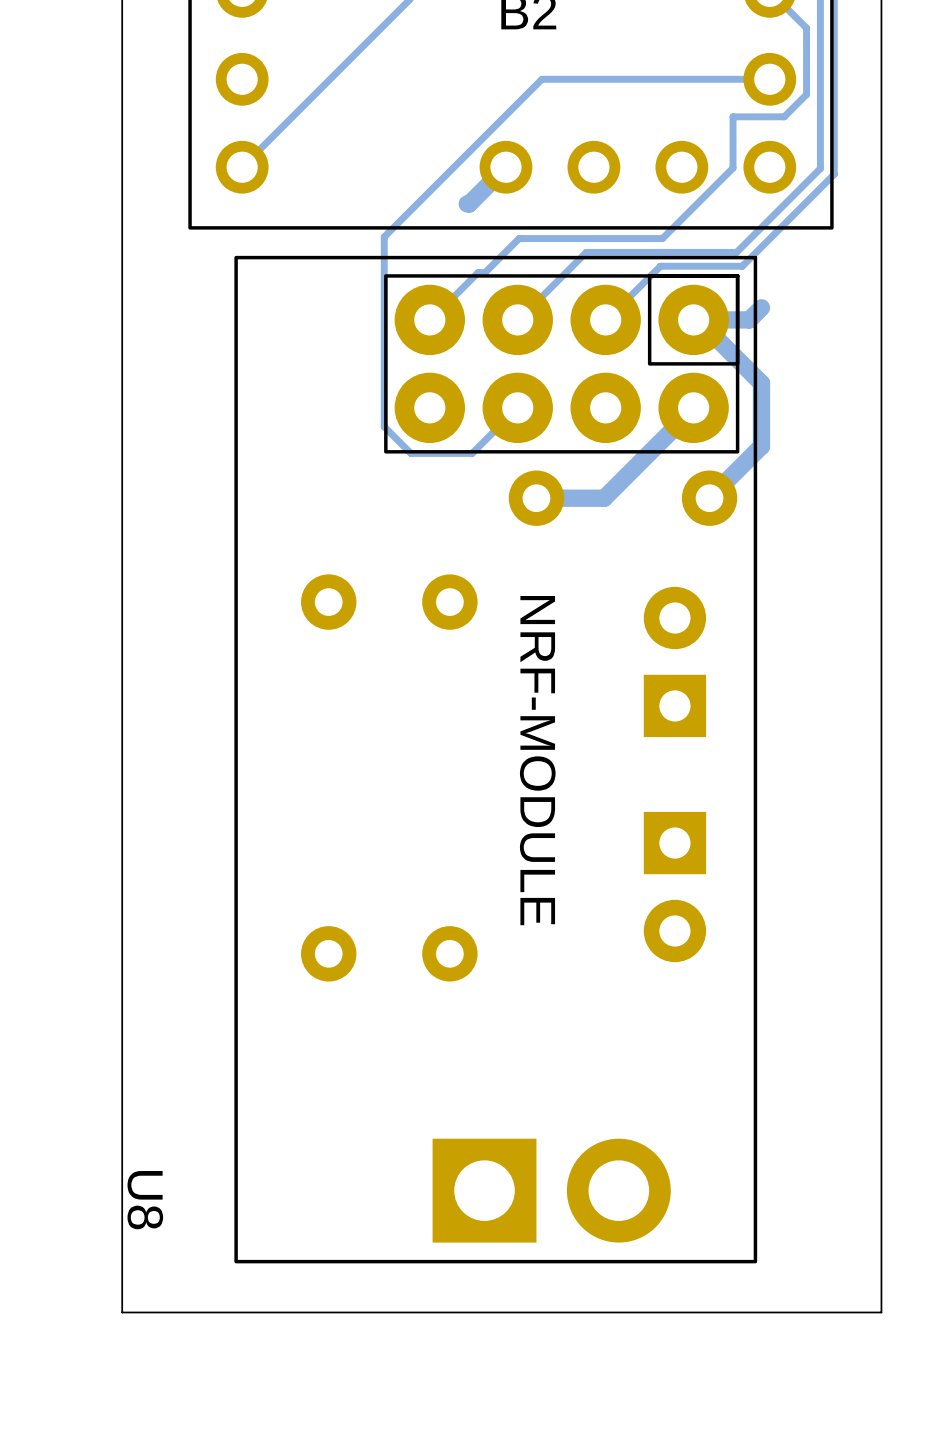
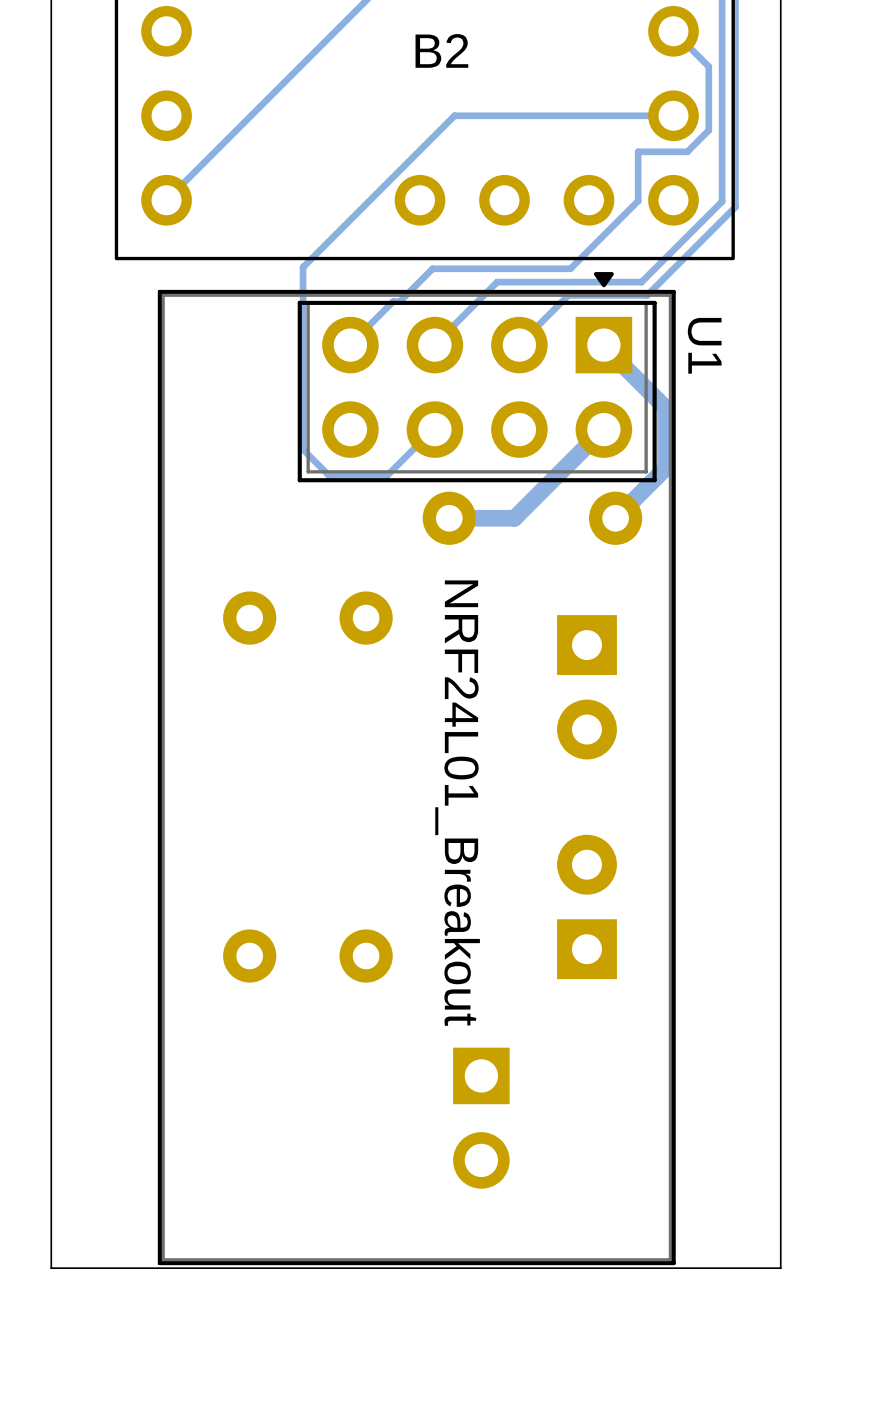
track: (505, 167) (467, 203) -> none
track: (761, 307) (749, 319) (693, 319) -> none
part rotation: 0° (674, 661) -> 180° (586, 687)
U1: none -> NRF24L01_Breakout (416, 768)
U8: NRF-MODULE (495, 759) -> none
part rotation: 0° (674, 887) -> 180° (586, 906)
part: none -> (481, 1118)
part: (551, 1190) -> none
board edge: (881, 1278) (881, 1312) (122, 1312) (122, 1278) -> (780, 1268) (51, 1268)

